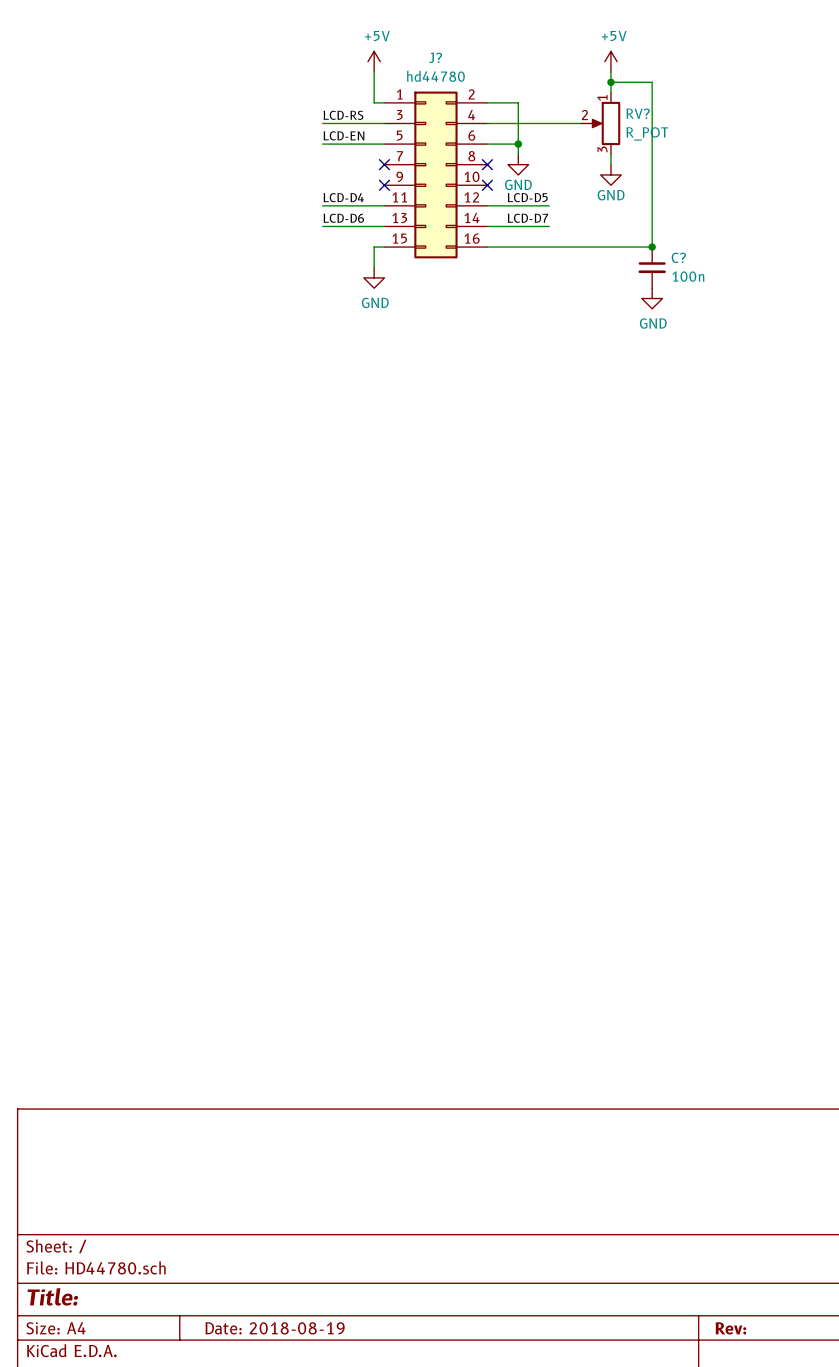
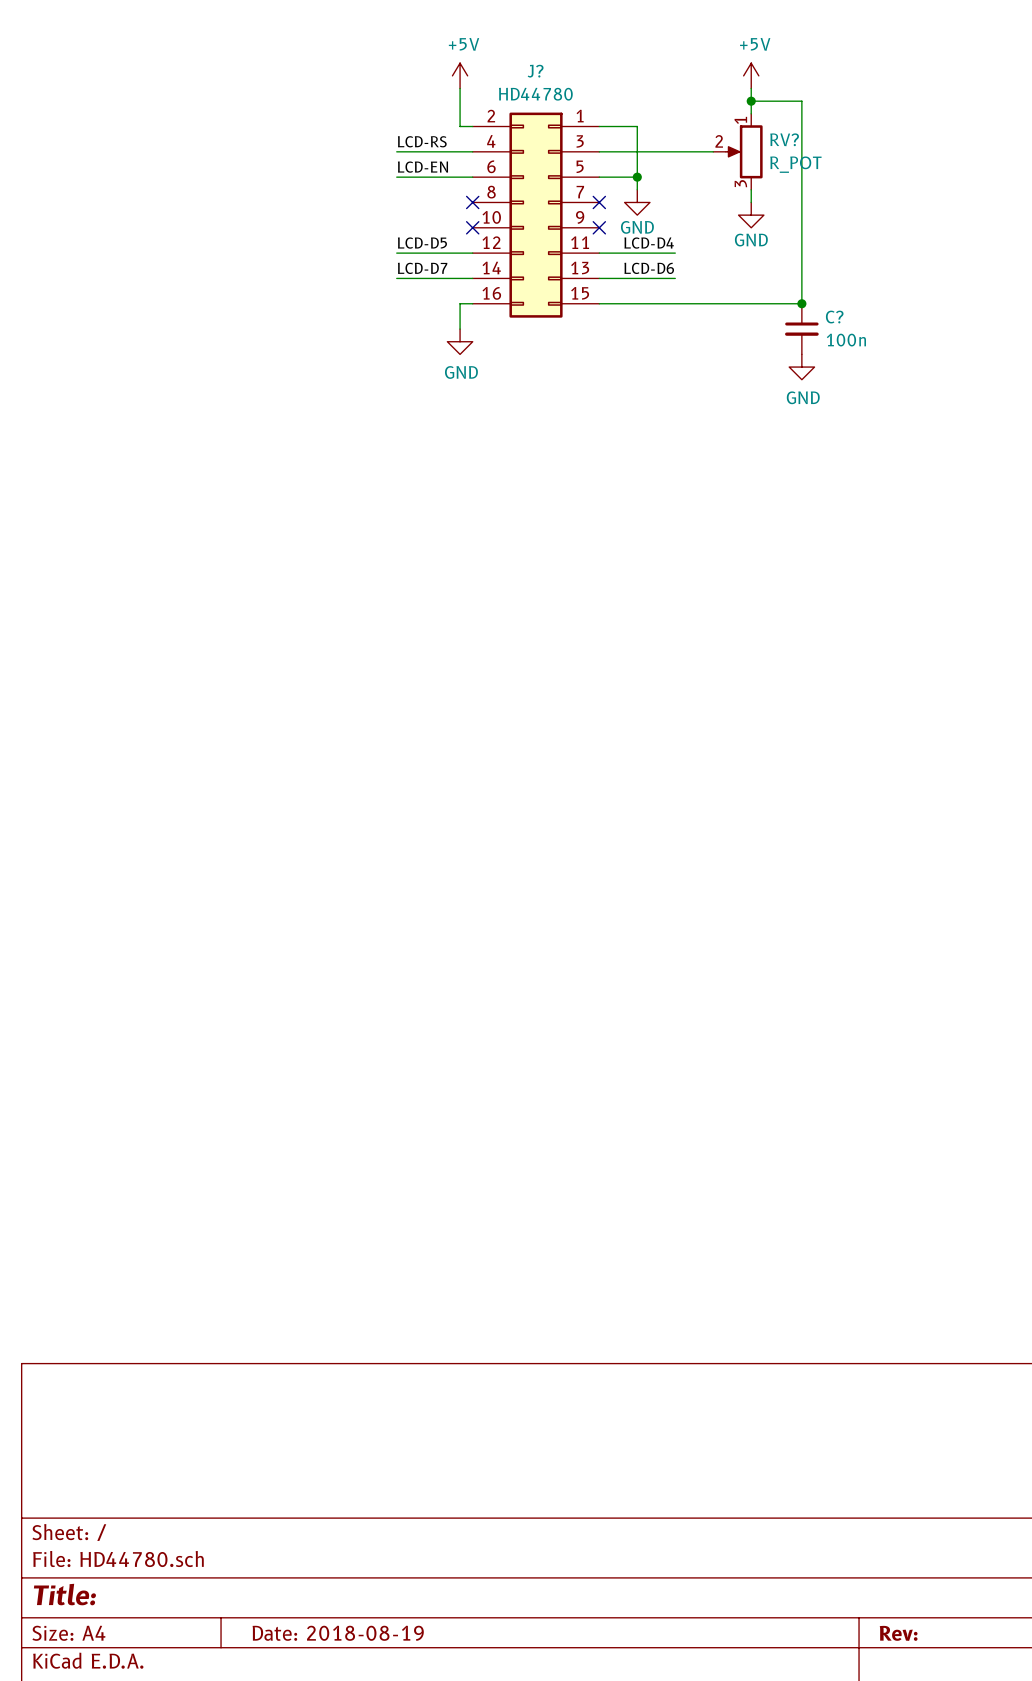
J? value: hd44780 (435, 76) -> HD44780 (535, 94)
J? flip: as is (435, 174) -> left-right (536, 215)
label: LCD-D4 (343, 197) -> LCD-D5 (422, 243)
label: LCD-D5 (527, 197) -> LCD-D4 (649, 243)
label: LCD-D6 (343, 218) -> LCD-D7 (422, 268)
label: LCD-D7 (527, 218) -> LCD-D6 (649, 268)

